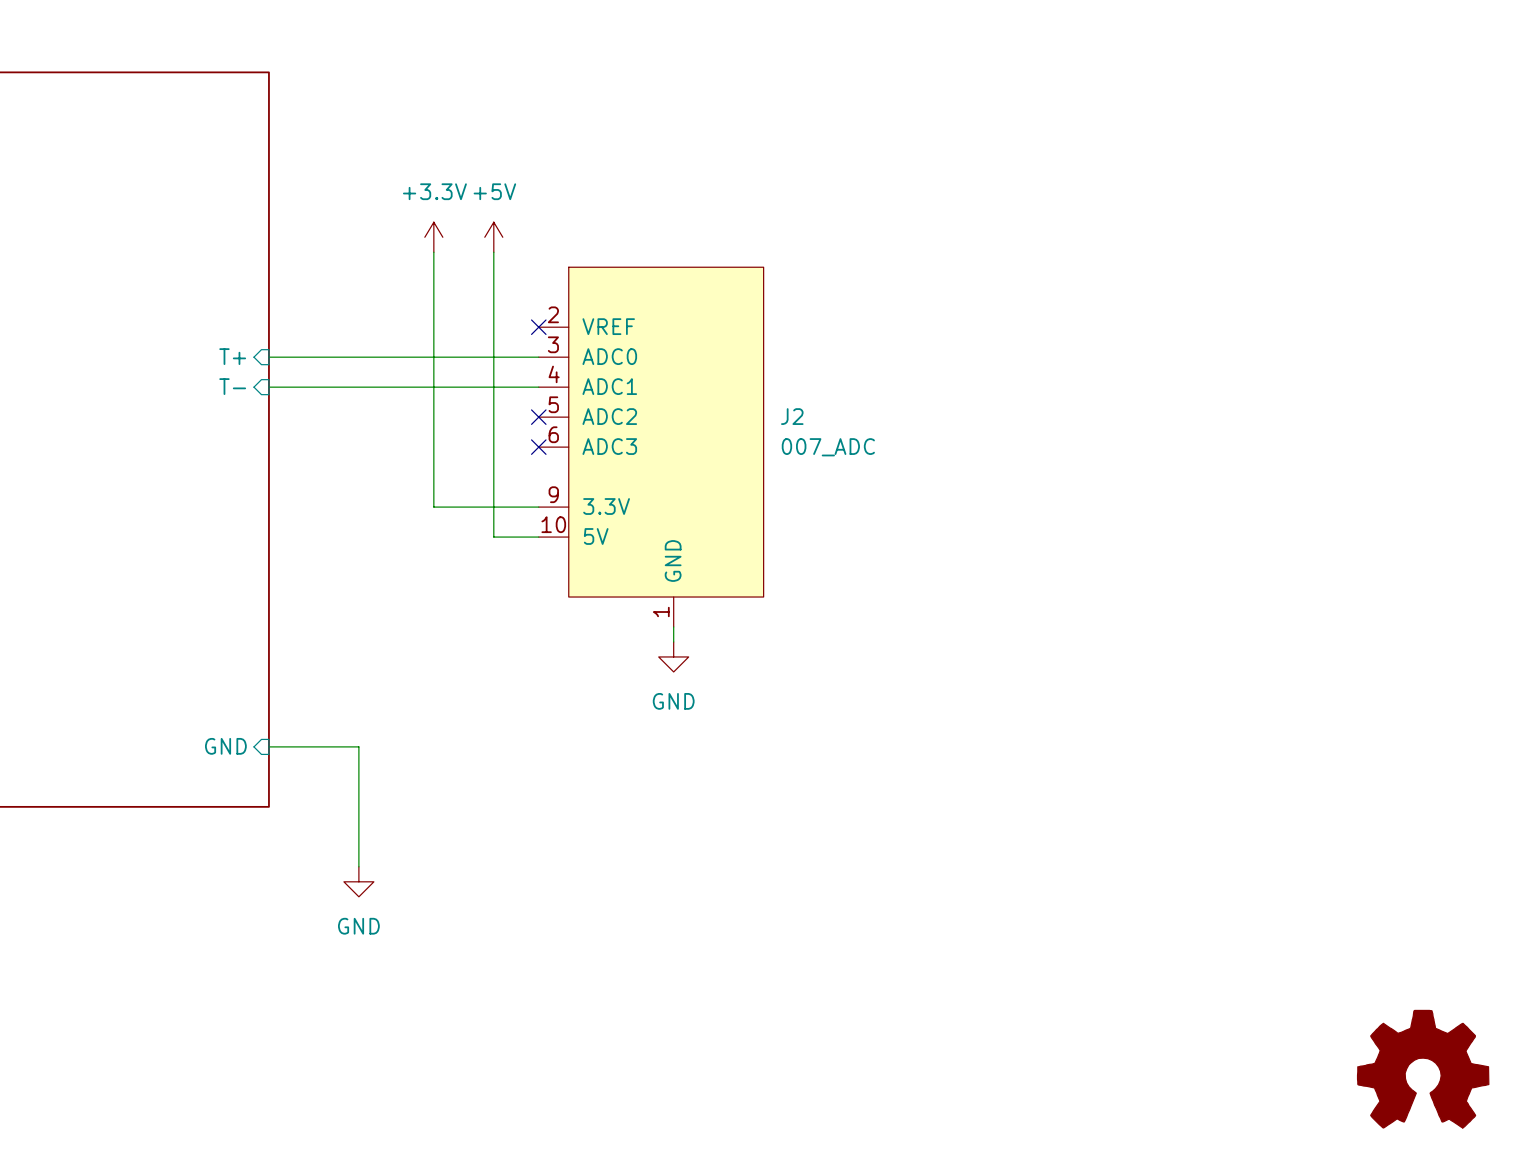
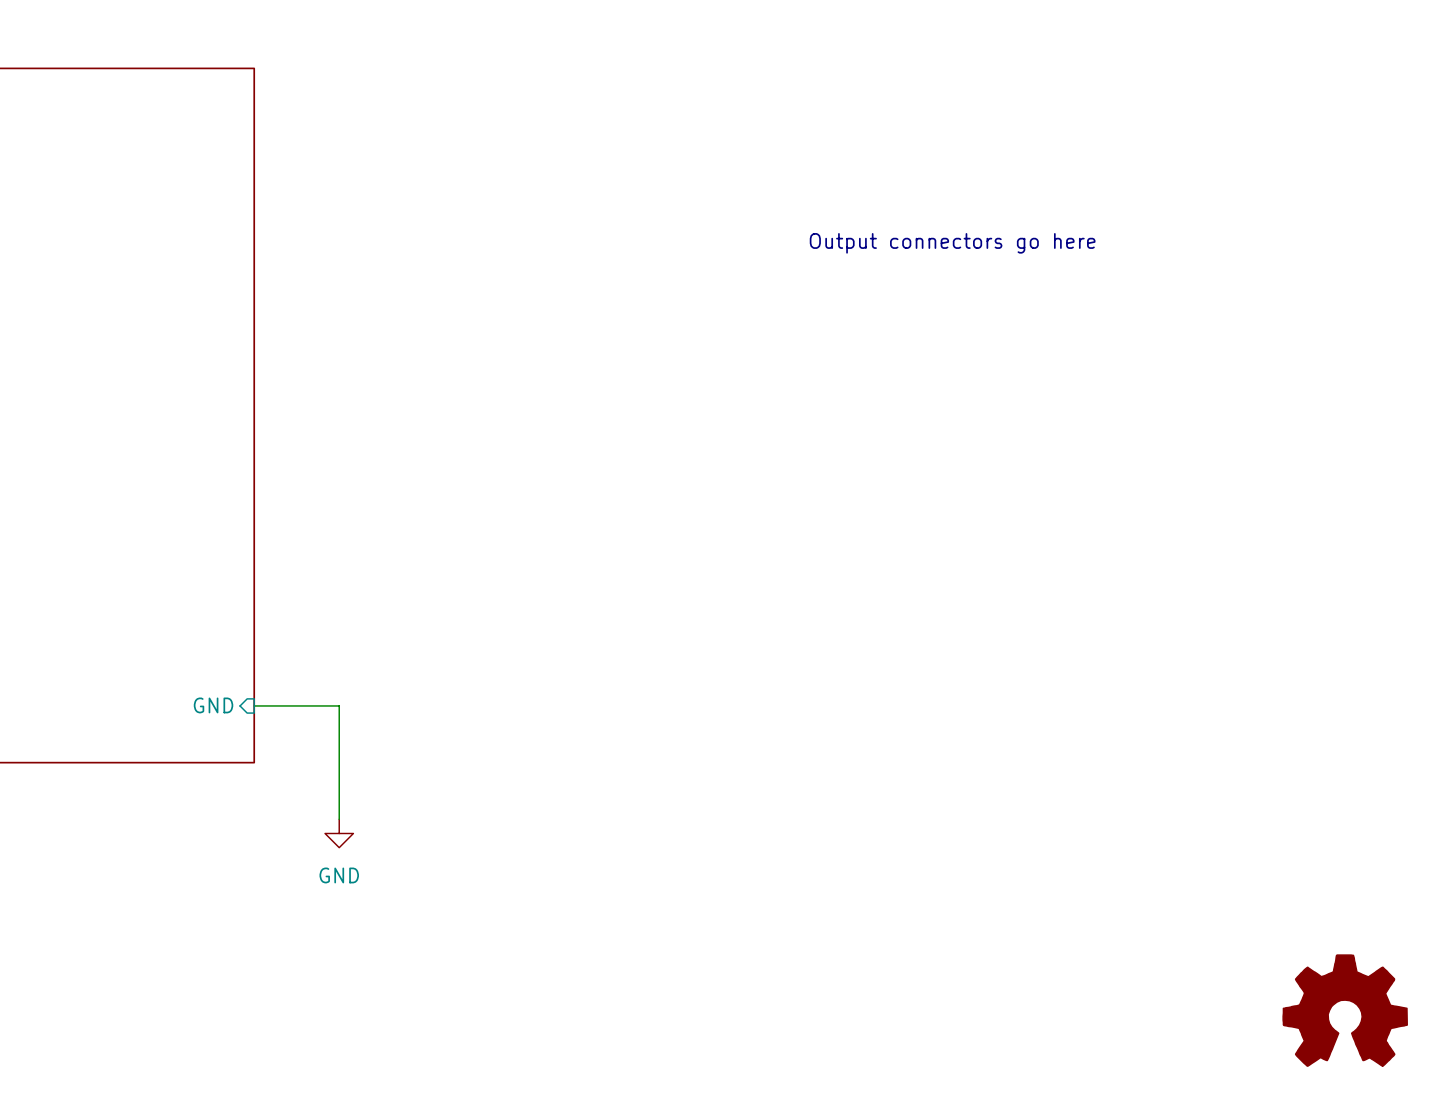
power symbol: +3.3V (433, 237) -> none
power symbol: +5V (493, 237) -> none
wire: (433, 252) (433, 507) (538, 507) -> none
wire: (493, 252) (493, 537) (538, 537) -> none
text: none -> Output connectors go here (952, 243)
no-connect mark: (538, 327) -> none
sheet pin: T+ (232, 356) -> none
wire: (268, 357) (538, 357) -> none
sheet pin: T- (232, 386) -> none
wire: (268, 387) (538, 387) -> none
no-connect mark: (538, 417) -> none
no-connect mark: (538, 447) -> none
J2: 007_ADC (651, 447) -> none
wire: (673, 626) (673, 641) -> none
power symbol: GND (673, 656) -> none

